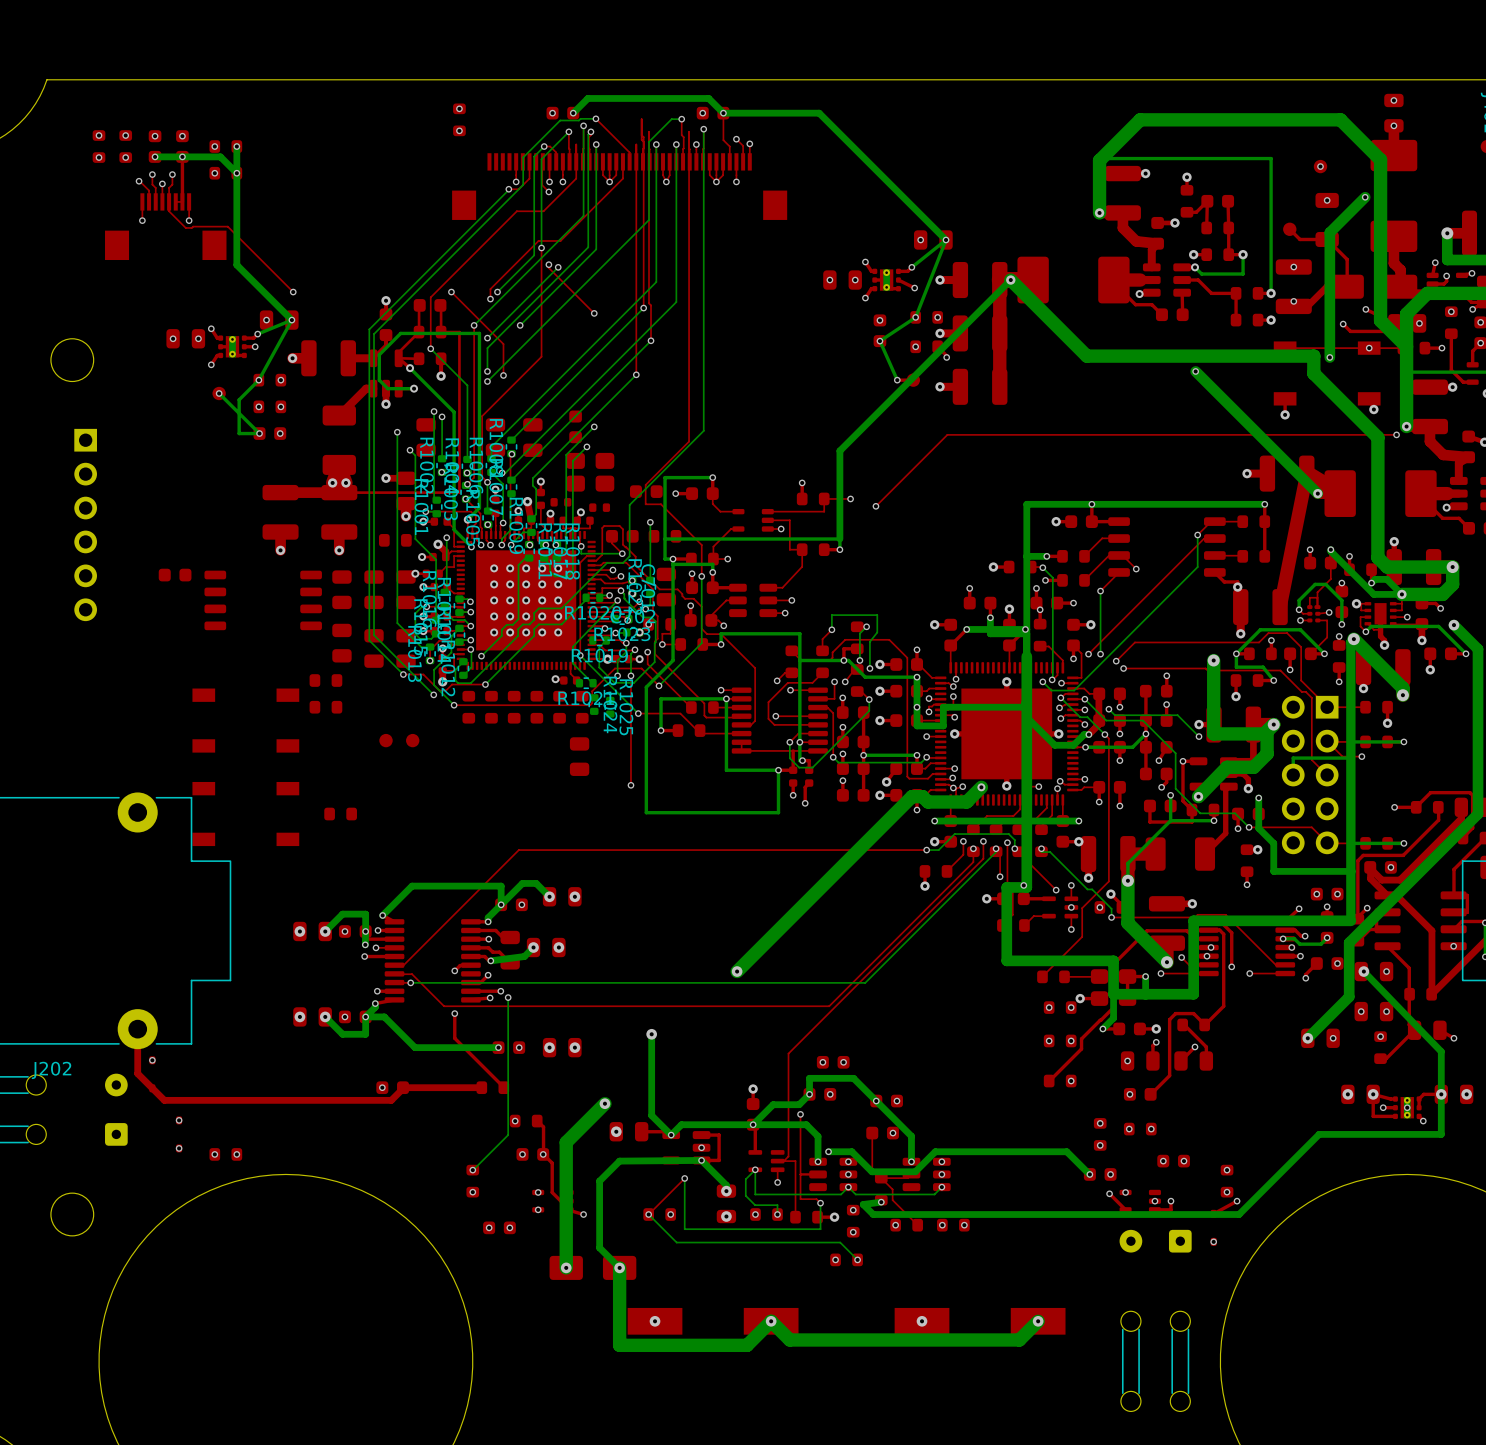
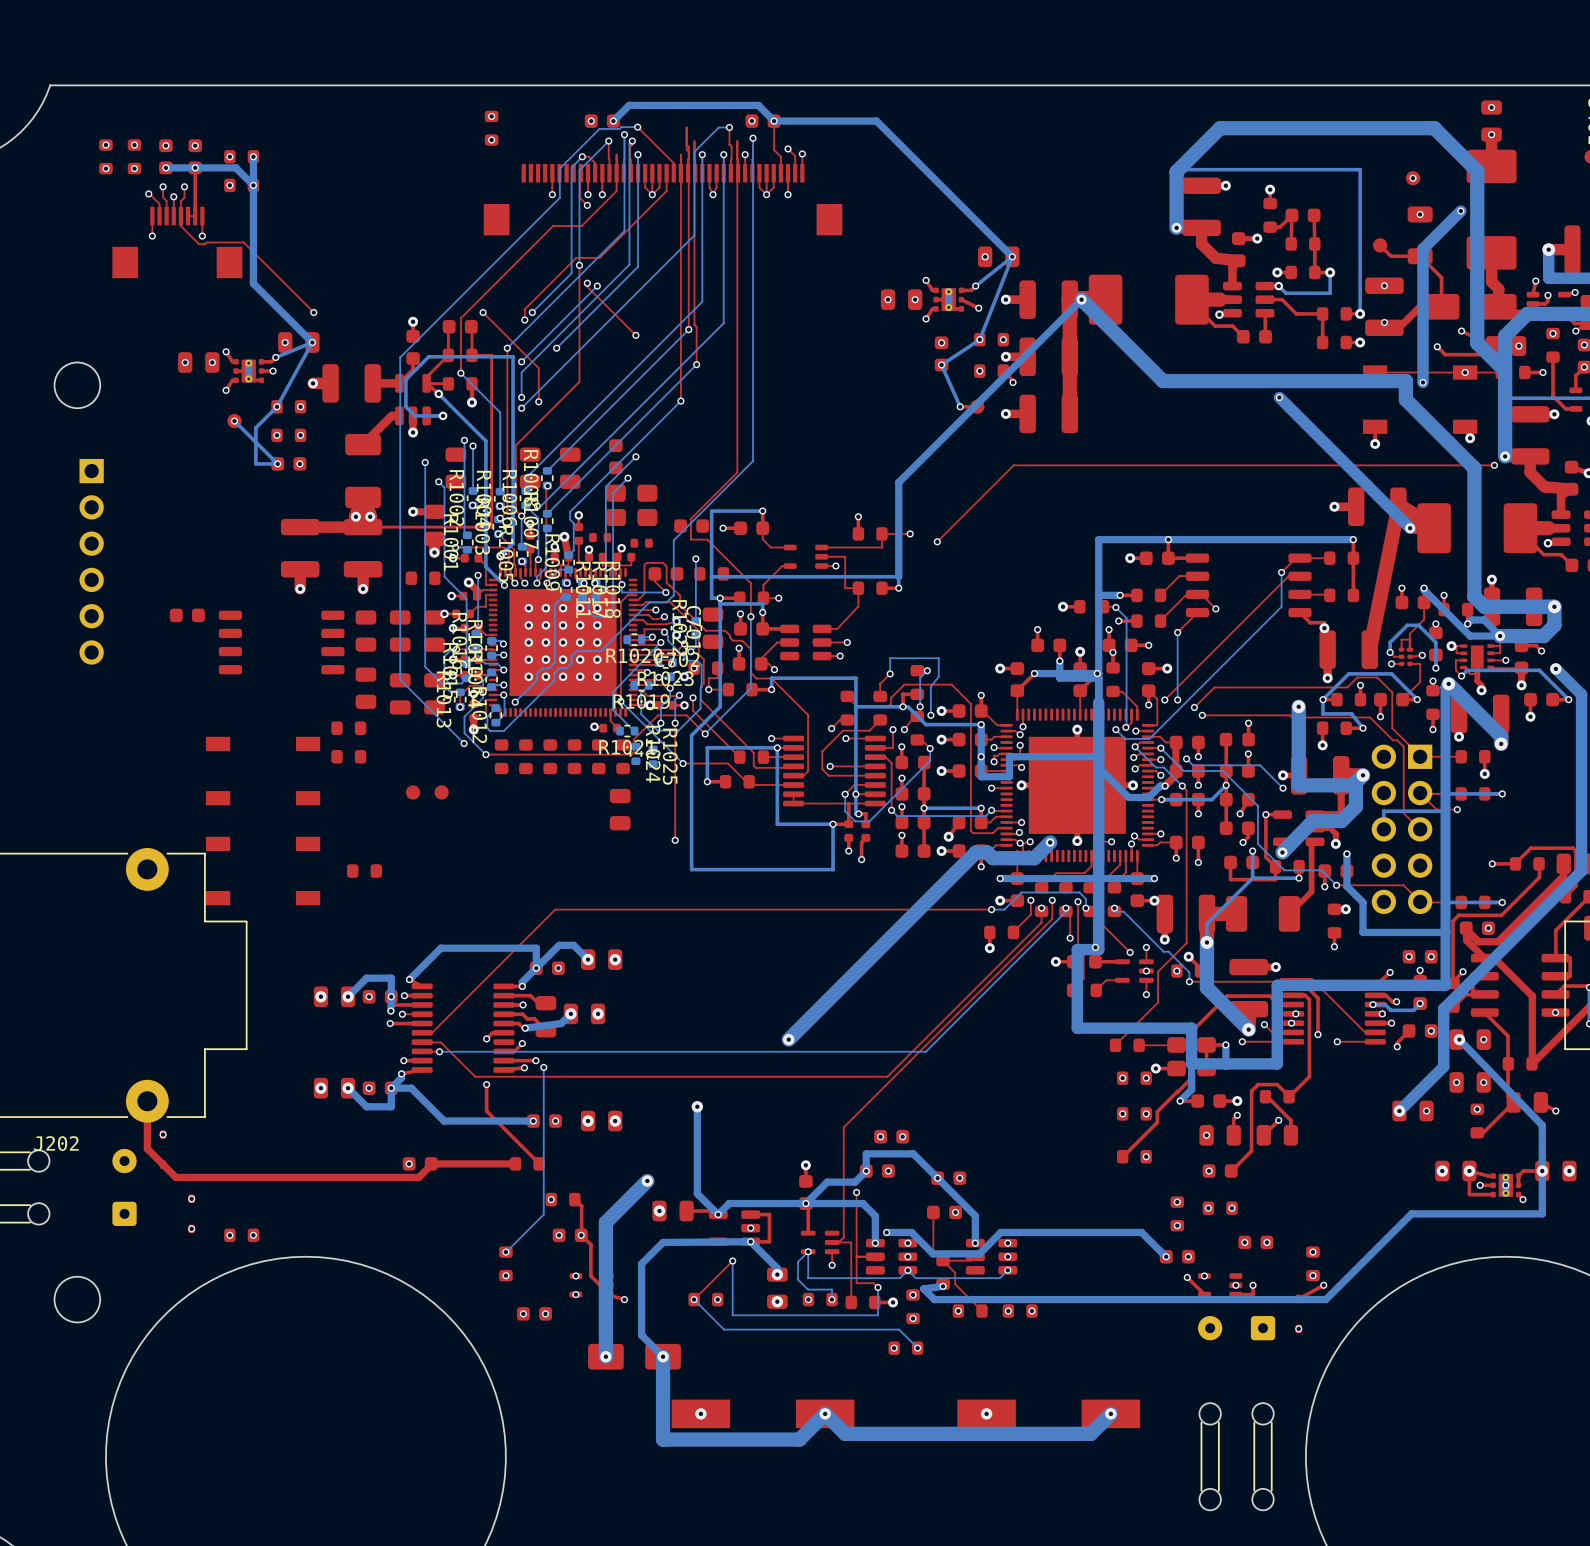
top track: (529, 161) (529, 178) (518, 189) (508, 189) -> none
bottom track: (508, 189) (369, 329) (369, 640) (403, 674) -> none
via: (508, 189) -> none
bottom track: (586, 597) (561, 624) (538, 624) (534, 629) (534, 635) (485, 684) -> none
top track: (403, 674) (423, 674) (439, 690) (446, 690) (452, 684) (485, 684) -> none
via: (403, 674) -> none
via: (485, 684) -> none

